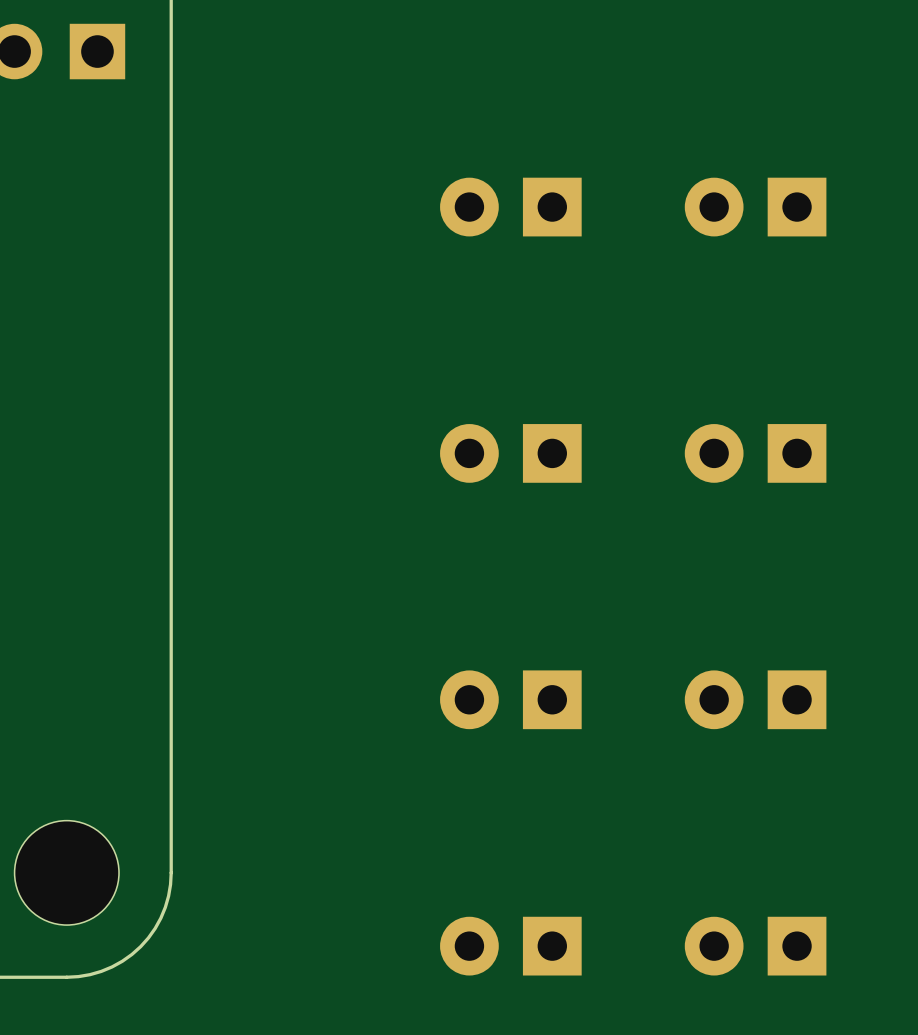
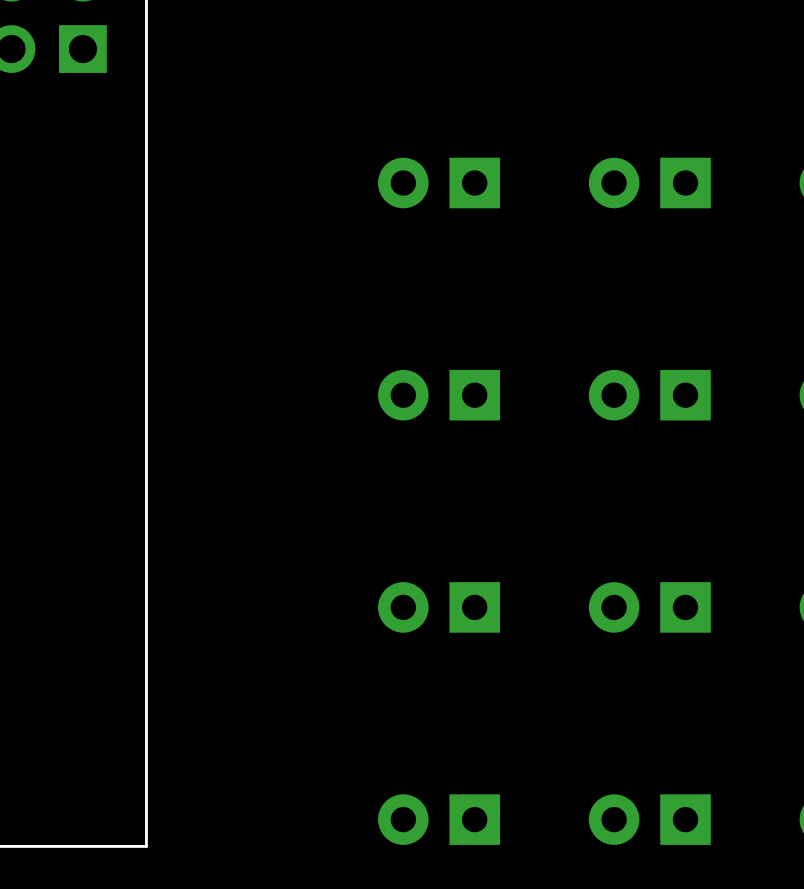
part: (66, 872) -> none
board edge: (171, 872) (165, 907) (155, 928) (140, 946) (122, 961) (101, 971) (66, 977) -> (146, 756) (146, 846) (56, 846)

